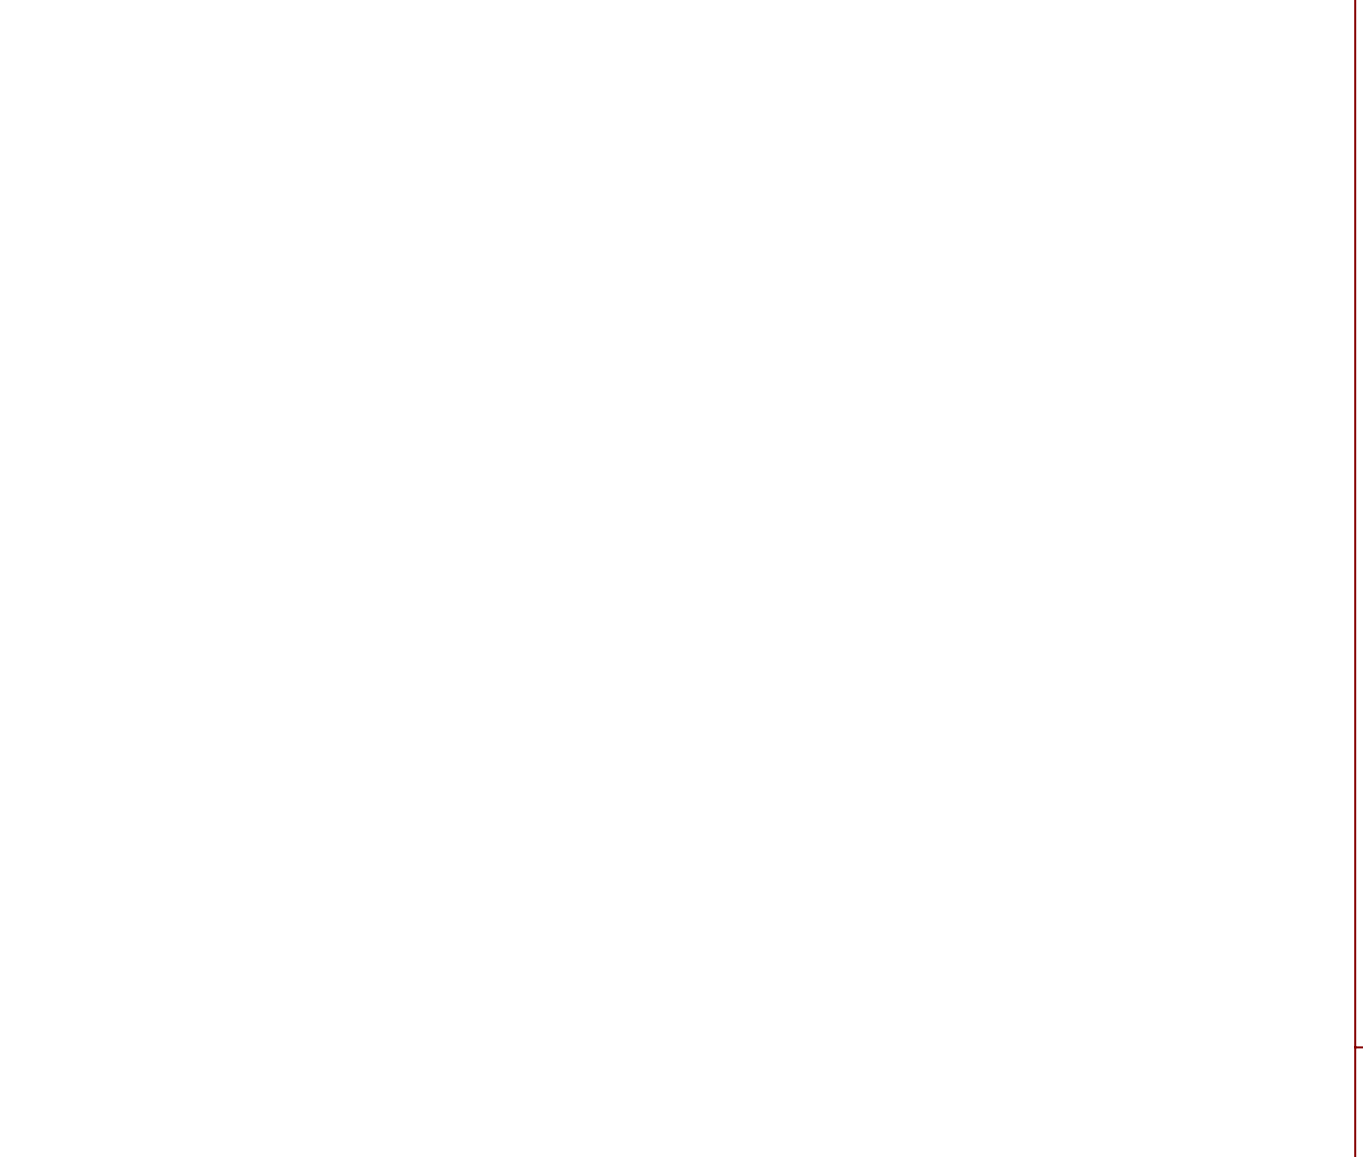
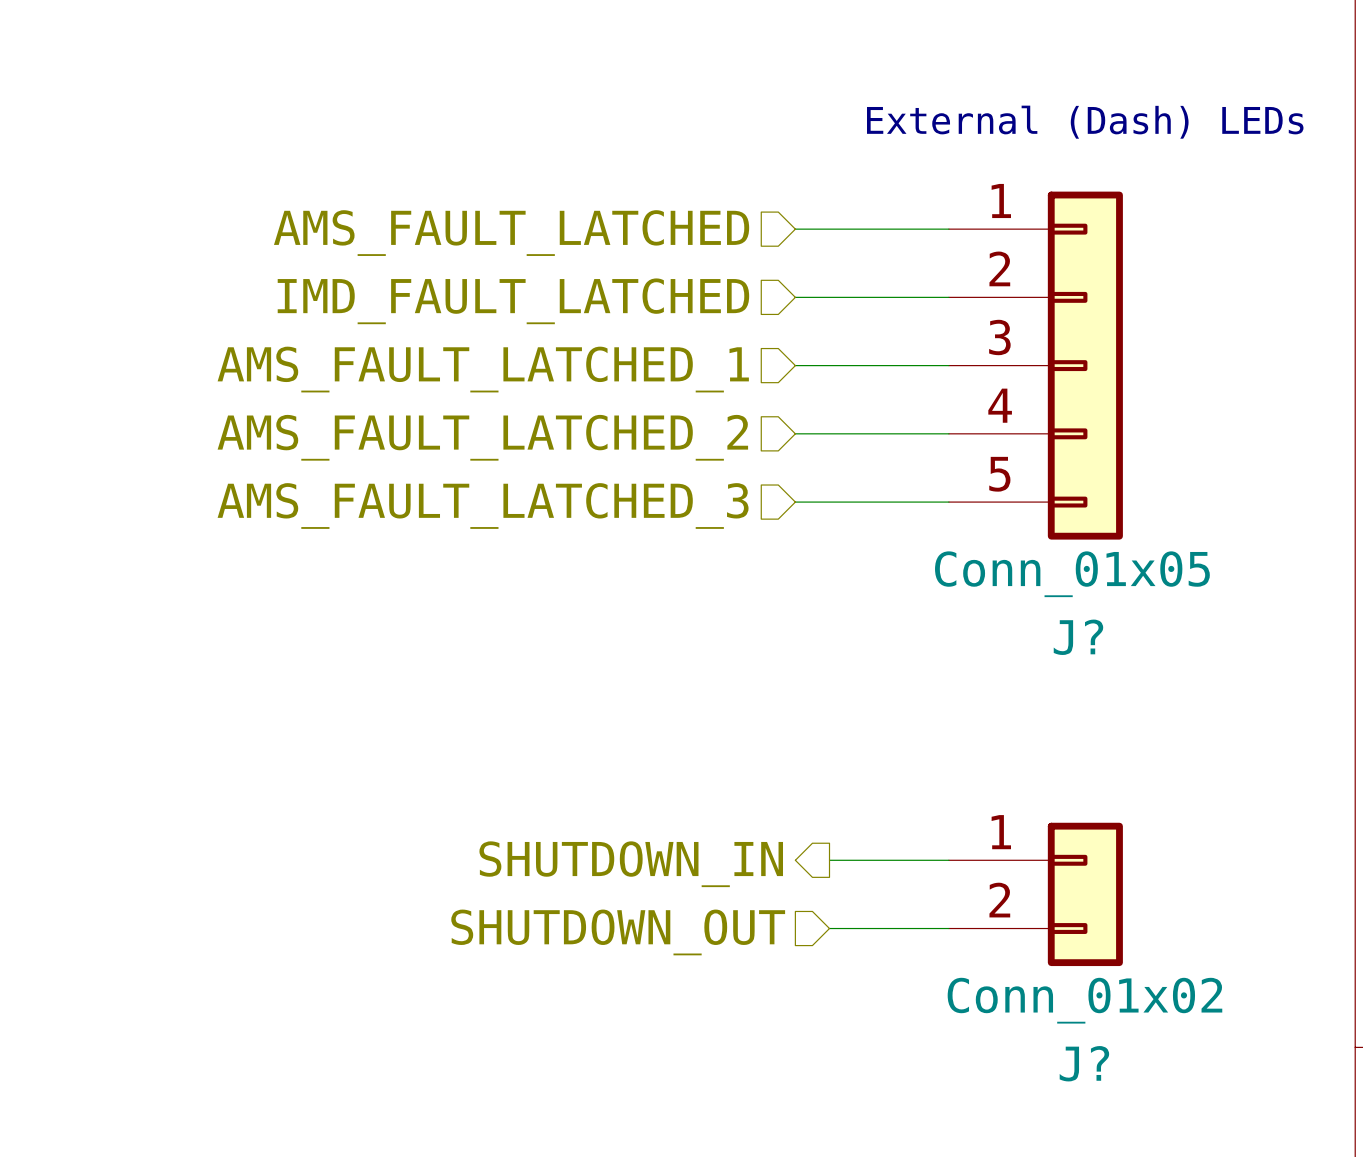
text: none -> External (Dash) LEDs (1085, 122)
hierarchical label: none -> AMS_FAULT_LATCHED (511, 233)
wire: none -> (795, 229) (948, 229)
hierarchical label: none -> IMD_FAULT_LATCHED (513, 301)
wire: none -> (795, 297) (948, 297)
hierarchical label: none -> AMS_FAULT_LATCHED_1 (483, 369)
wire: none -> (795, 365) (948, 365)
J?: none -> Conn_01x05 (1035, 365)
wire: none -> (795, 433) (948, 433)
hierarchical label: none -> AMS_FAULT_LATCHED_2 (482, 437)
hierarchical label: none -> AMS_FAULT_LATCHED_3 (483, 506)
wire: none -> (795, 502) (948, 502)
hierarchical label: none -> SHUTDOWN_IN (631, 864)
wire: none -> (829, 860) (948, 860)
J?: none -> Conn_01x02 (1035, 894)
hierarchical label: none -> SHUTDOWN_OUT (618, 932)
wire: none -> (829, 928) (948, 928)

